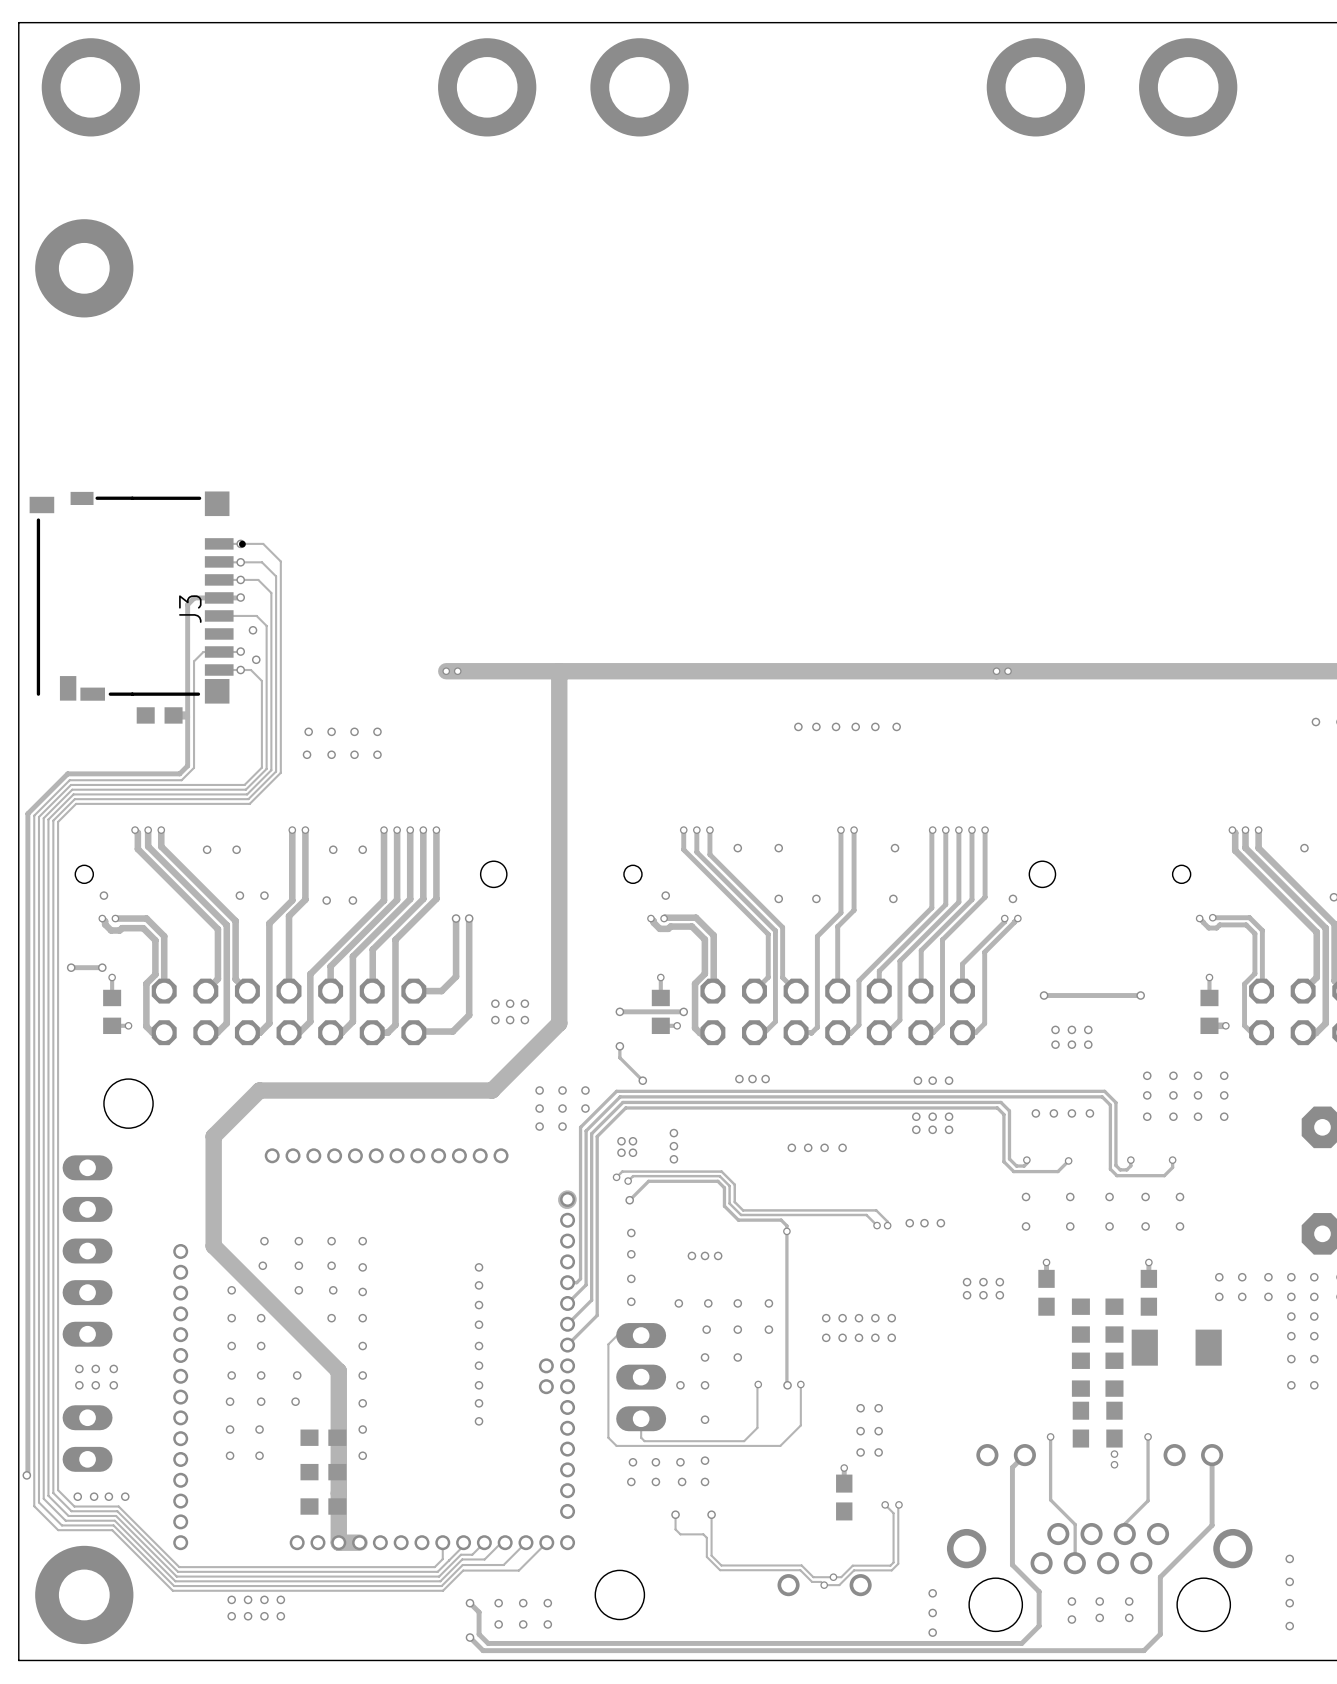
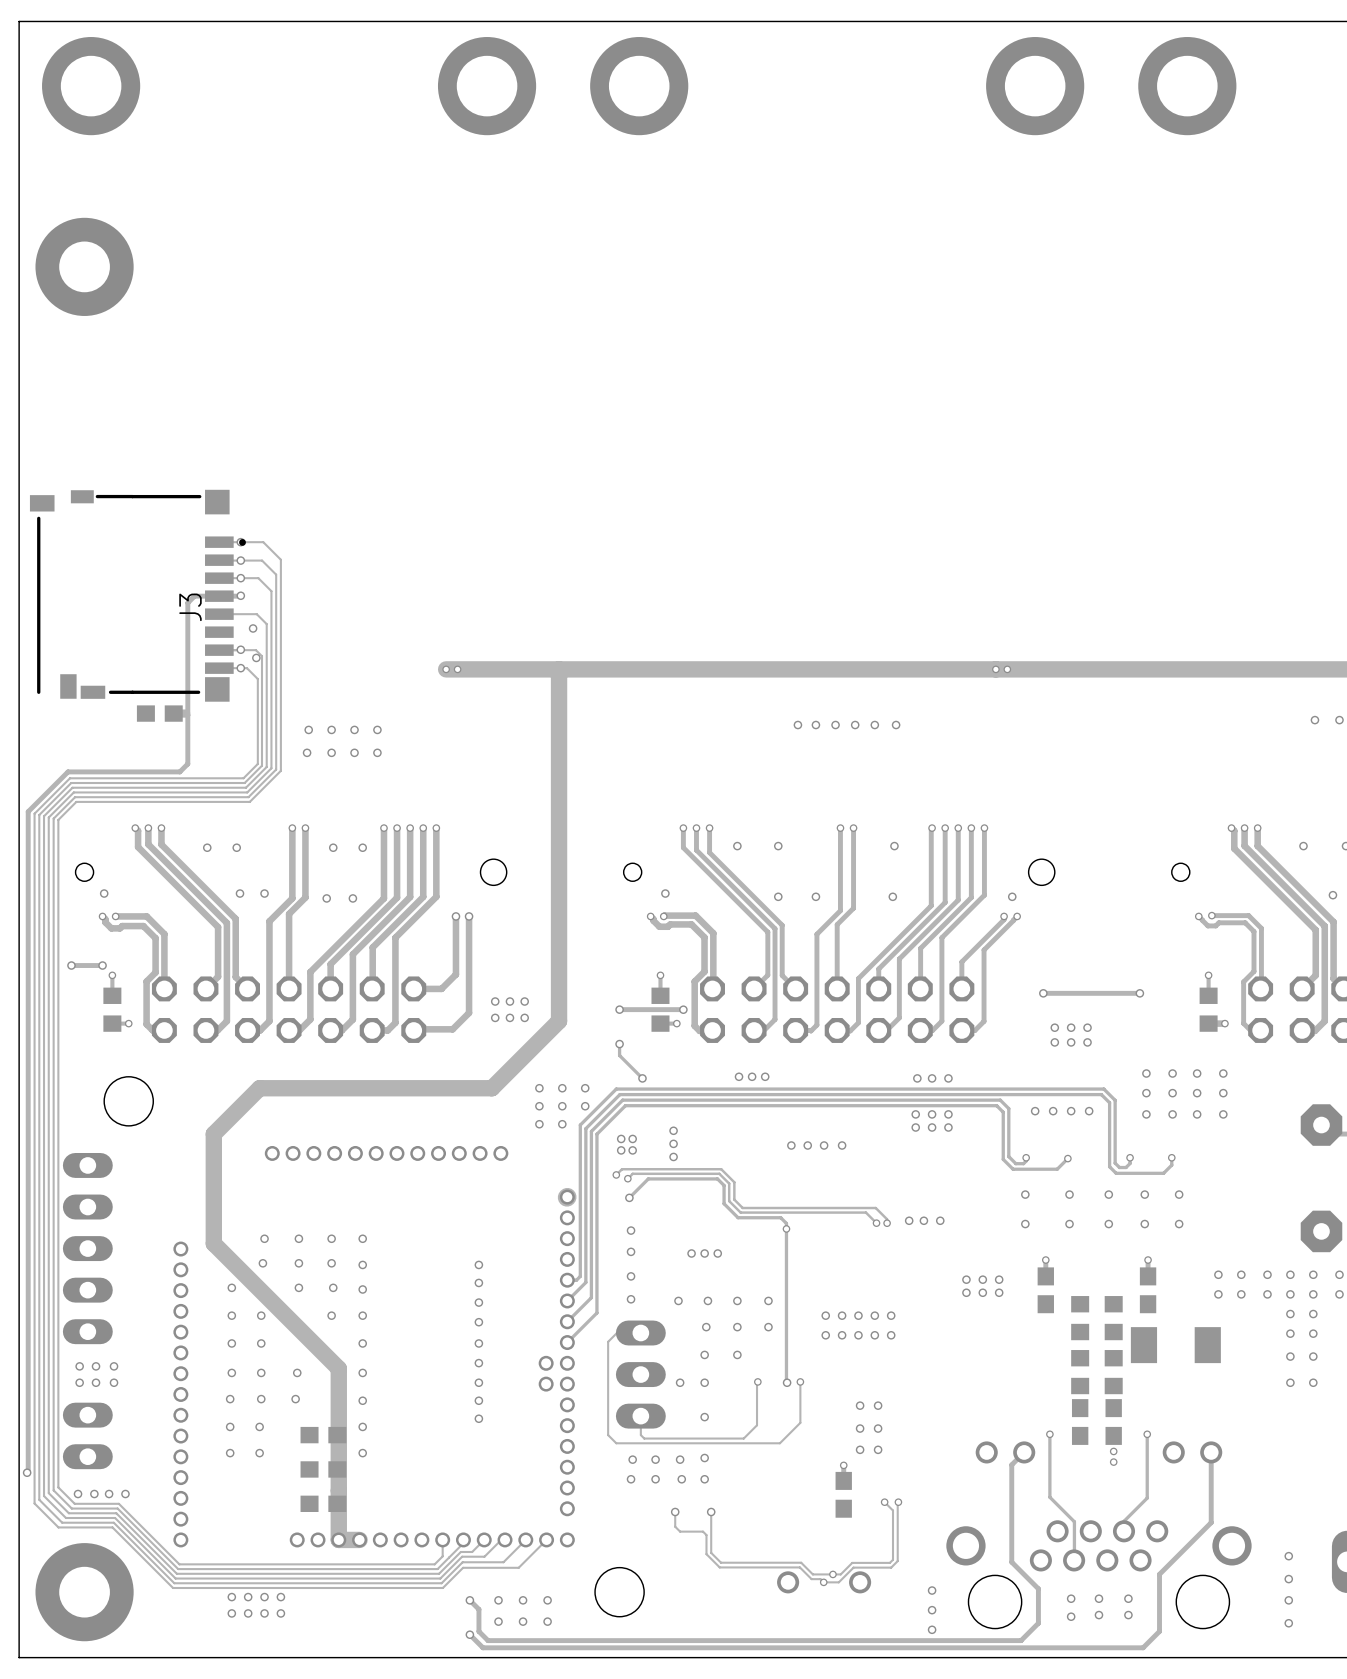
track: (219, 651) (203, 651) (194, 661) (194, 767) (181, 780) -> (246, 668) (257, 679) (257, 763) (243, 778) (181, 778)
track: (246, 670) (250, 670) (261, 680) -> (240, 650) (255, 650) (261, 656) (261, 679)

